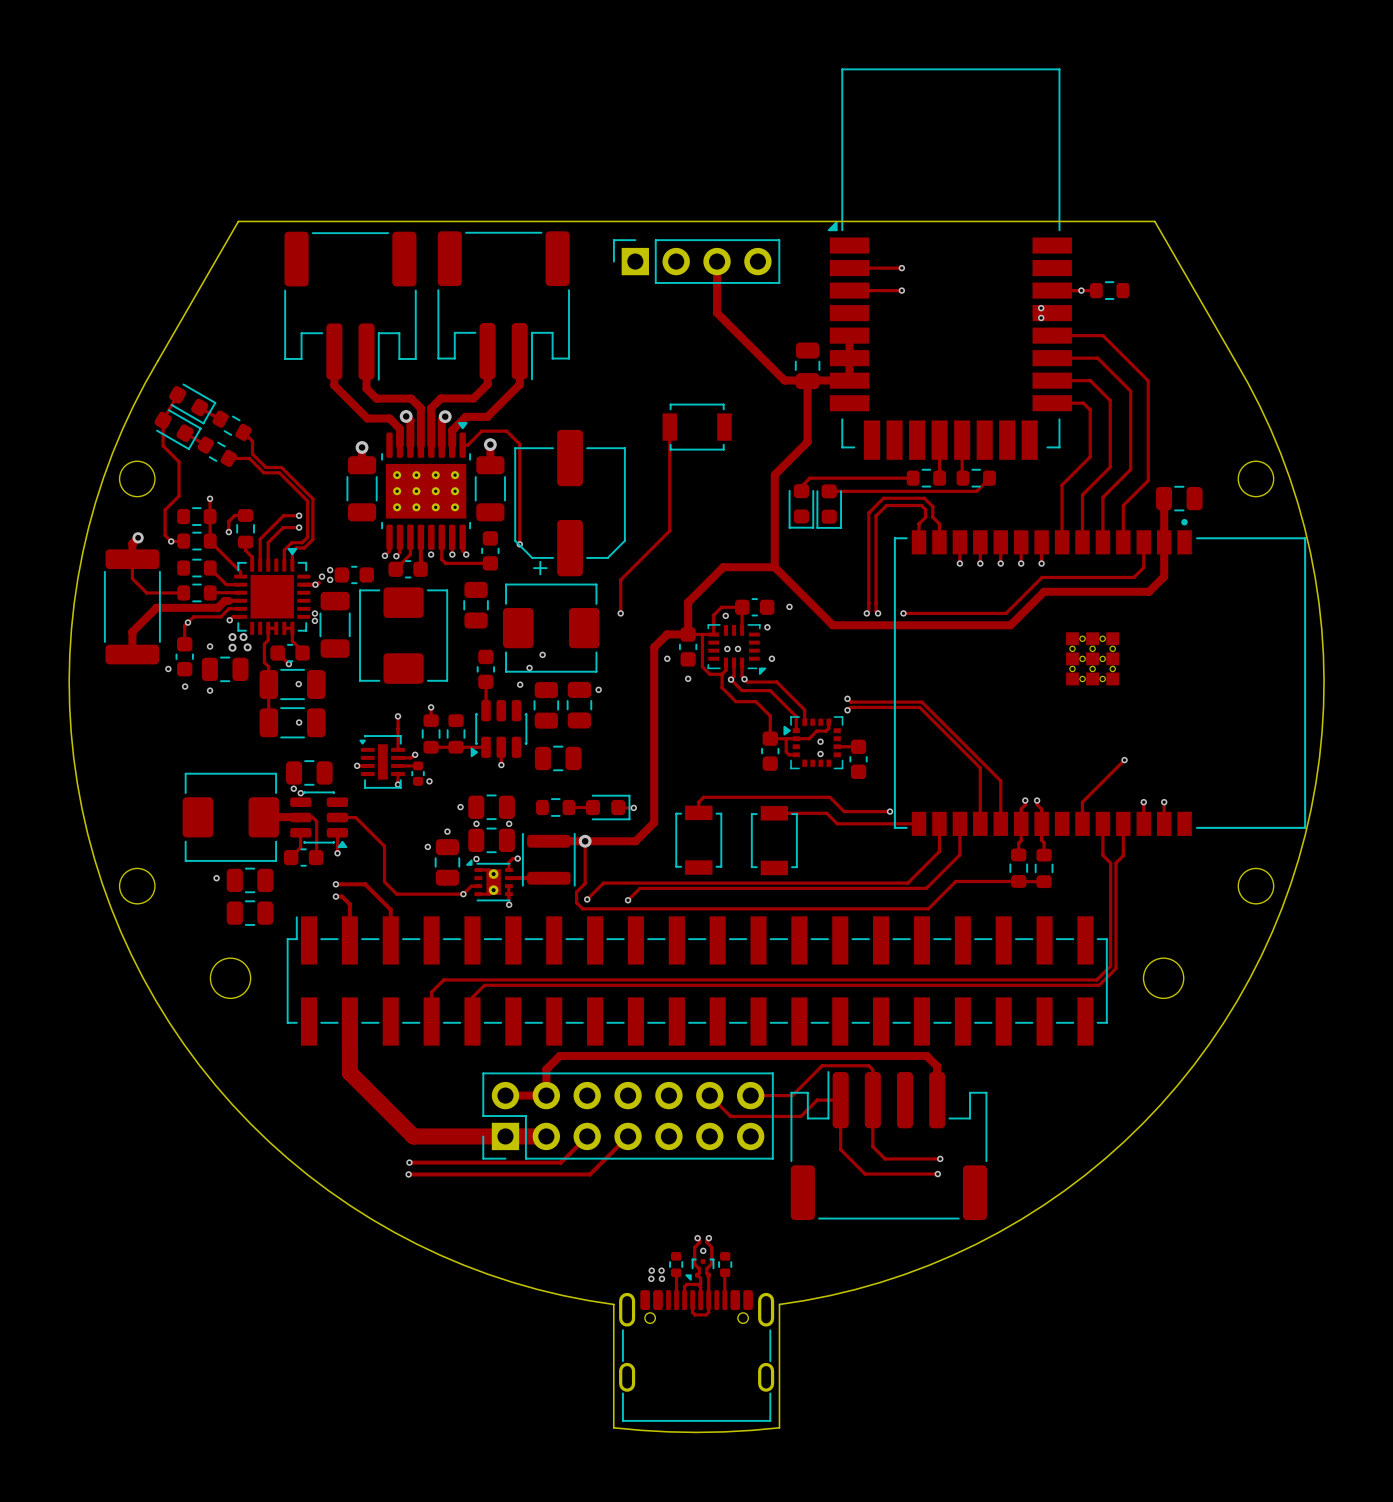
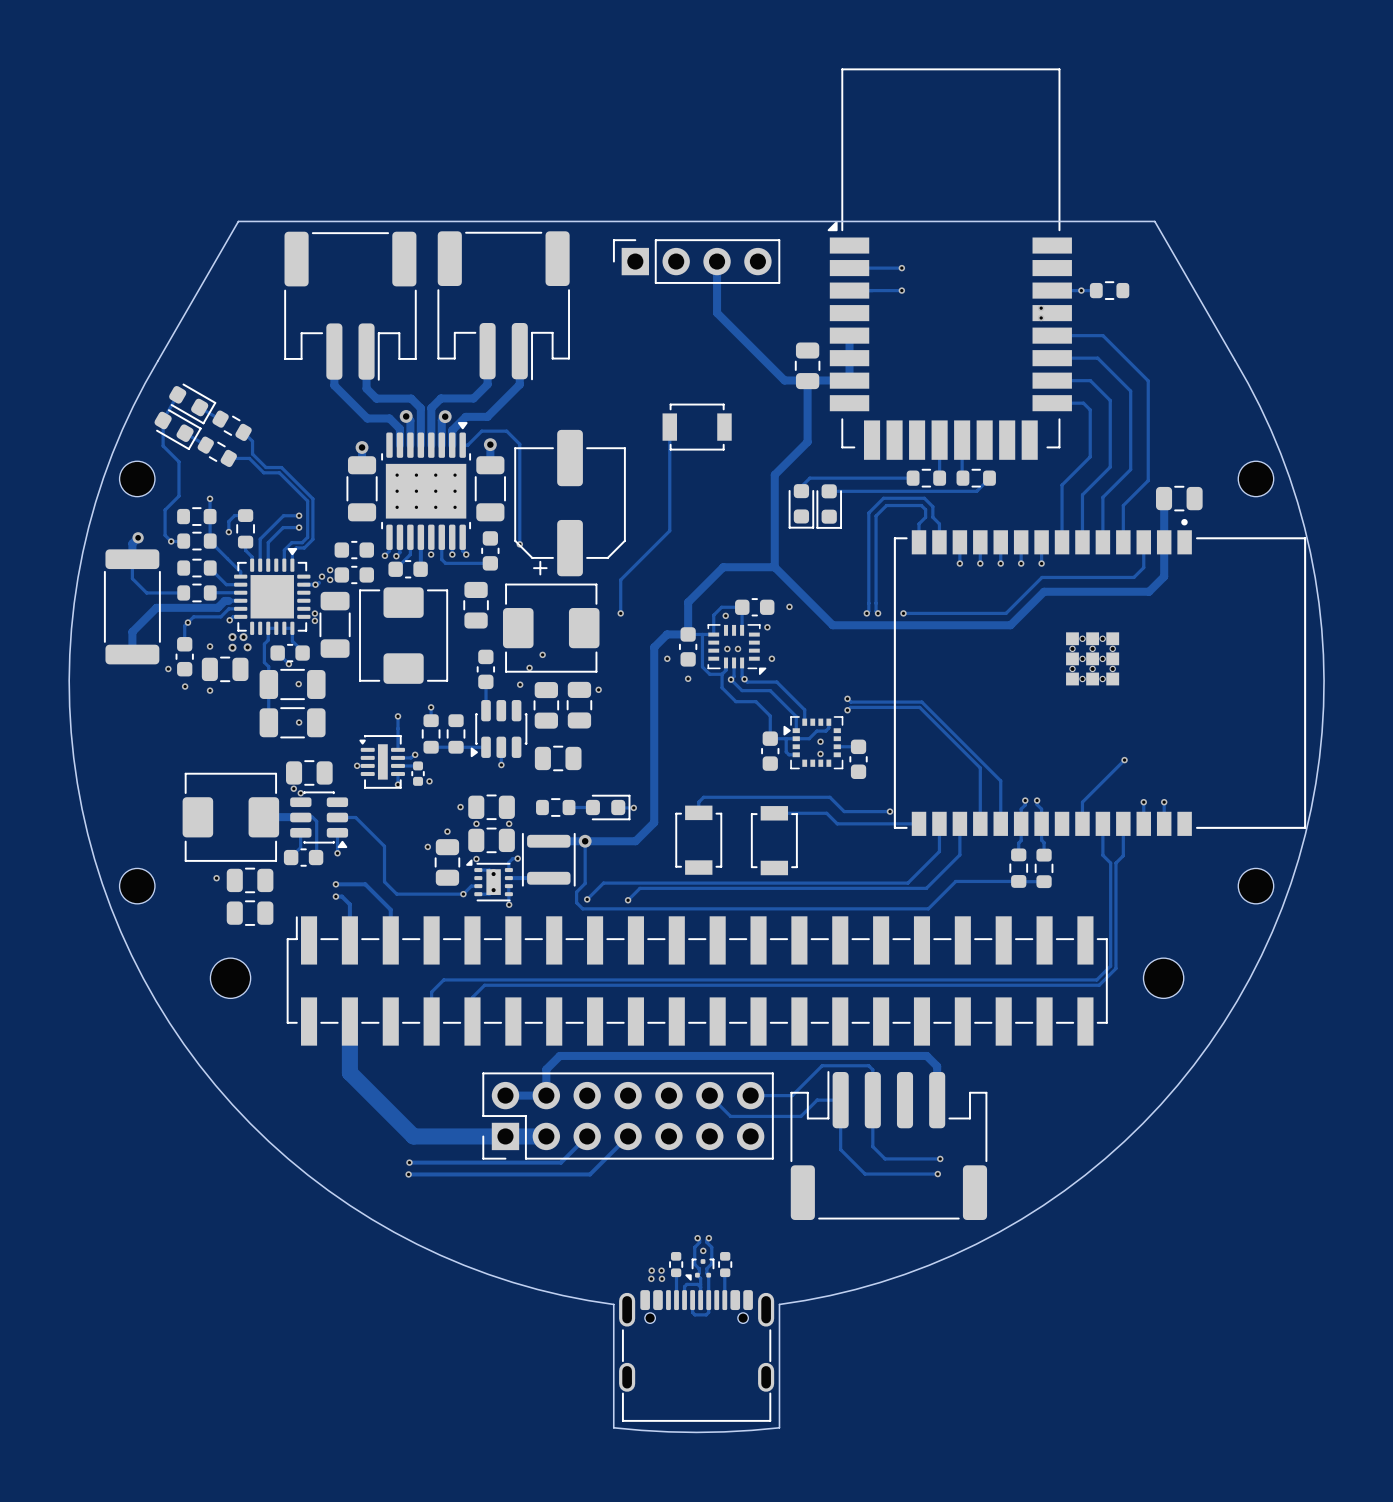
part: none -> (354, 550)

